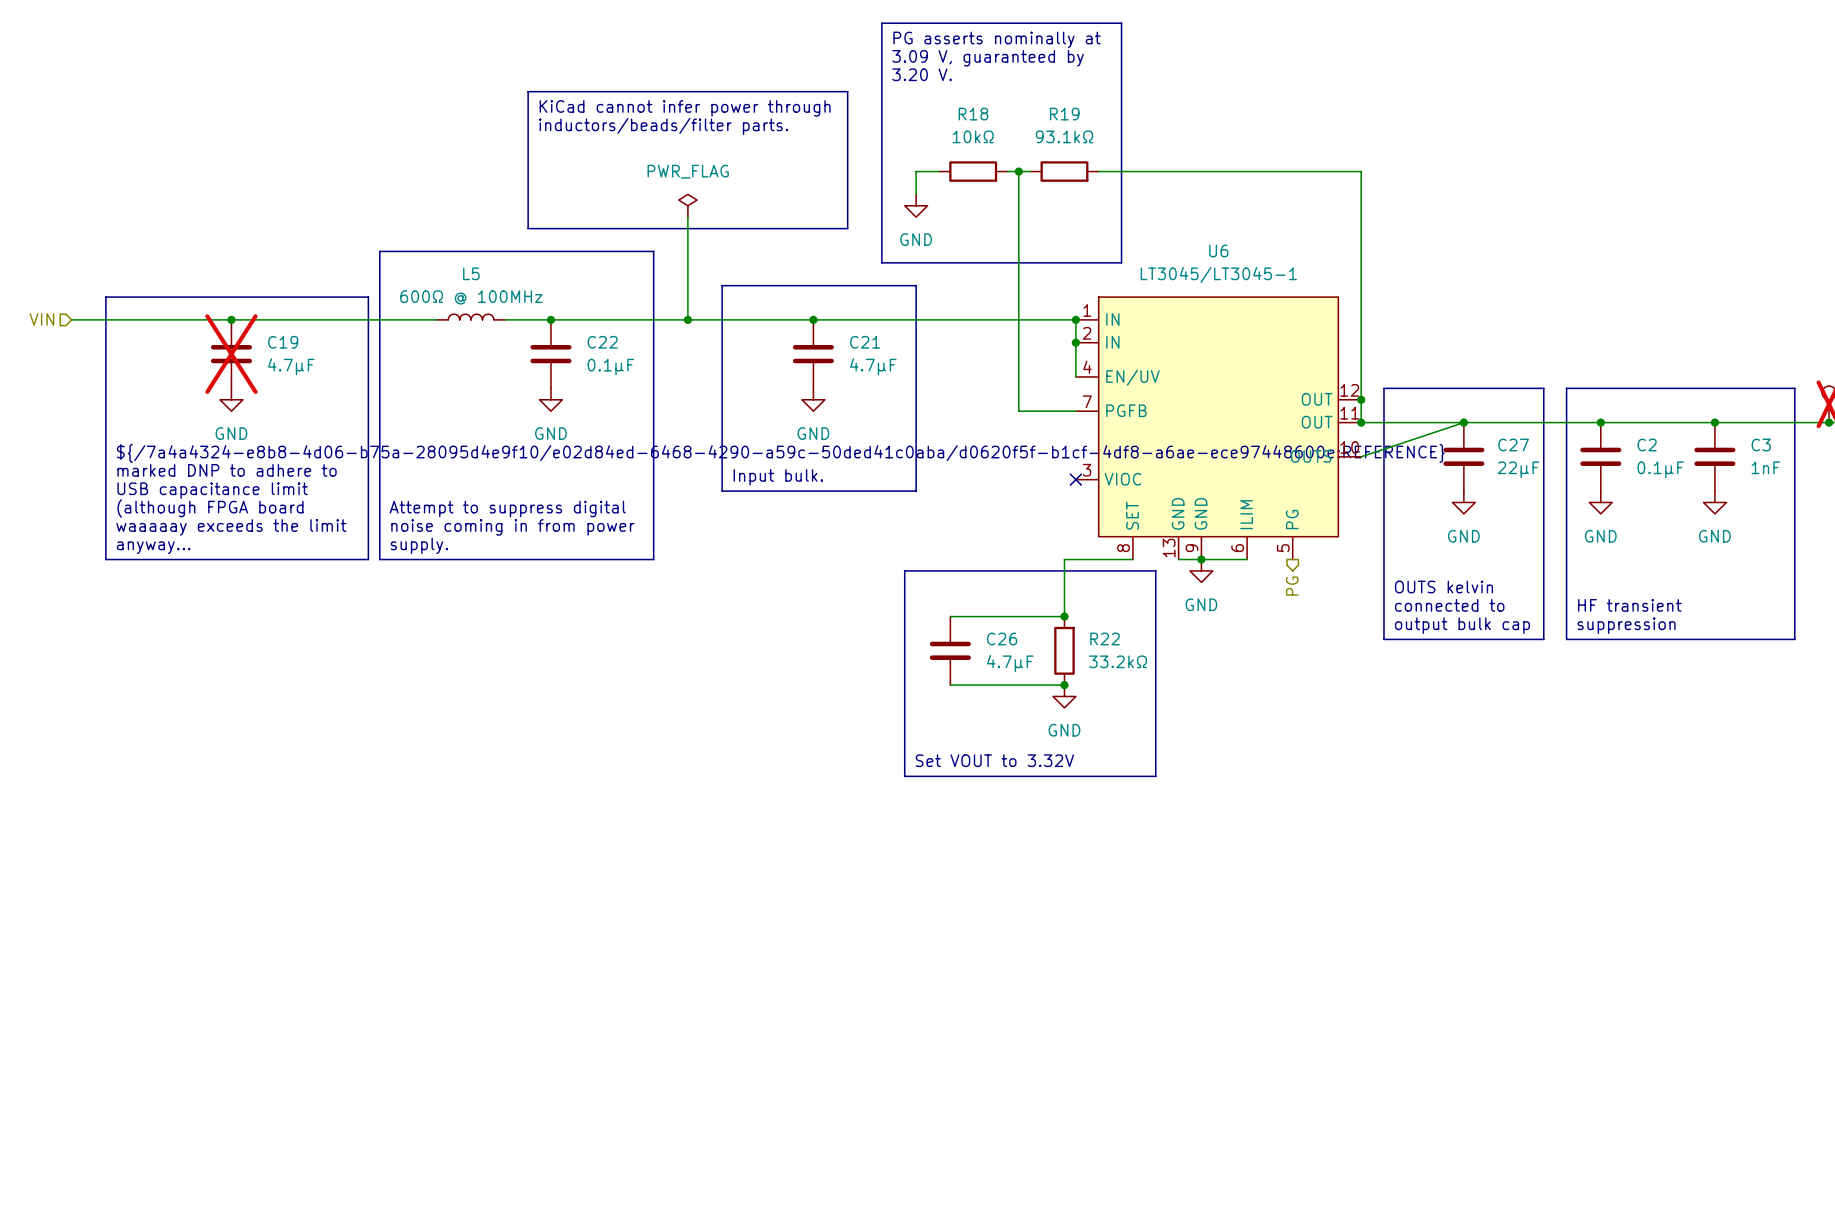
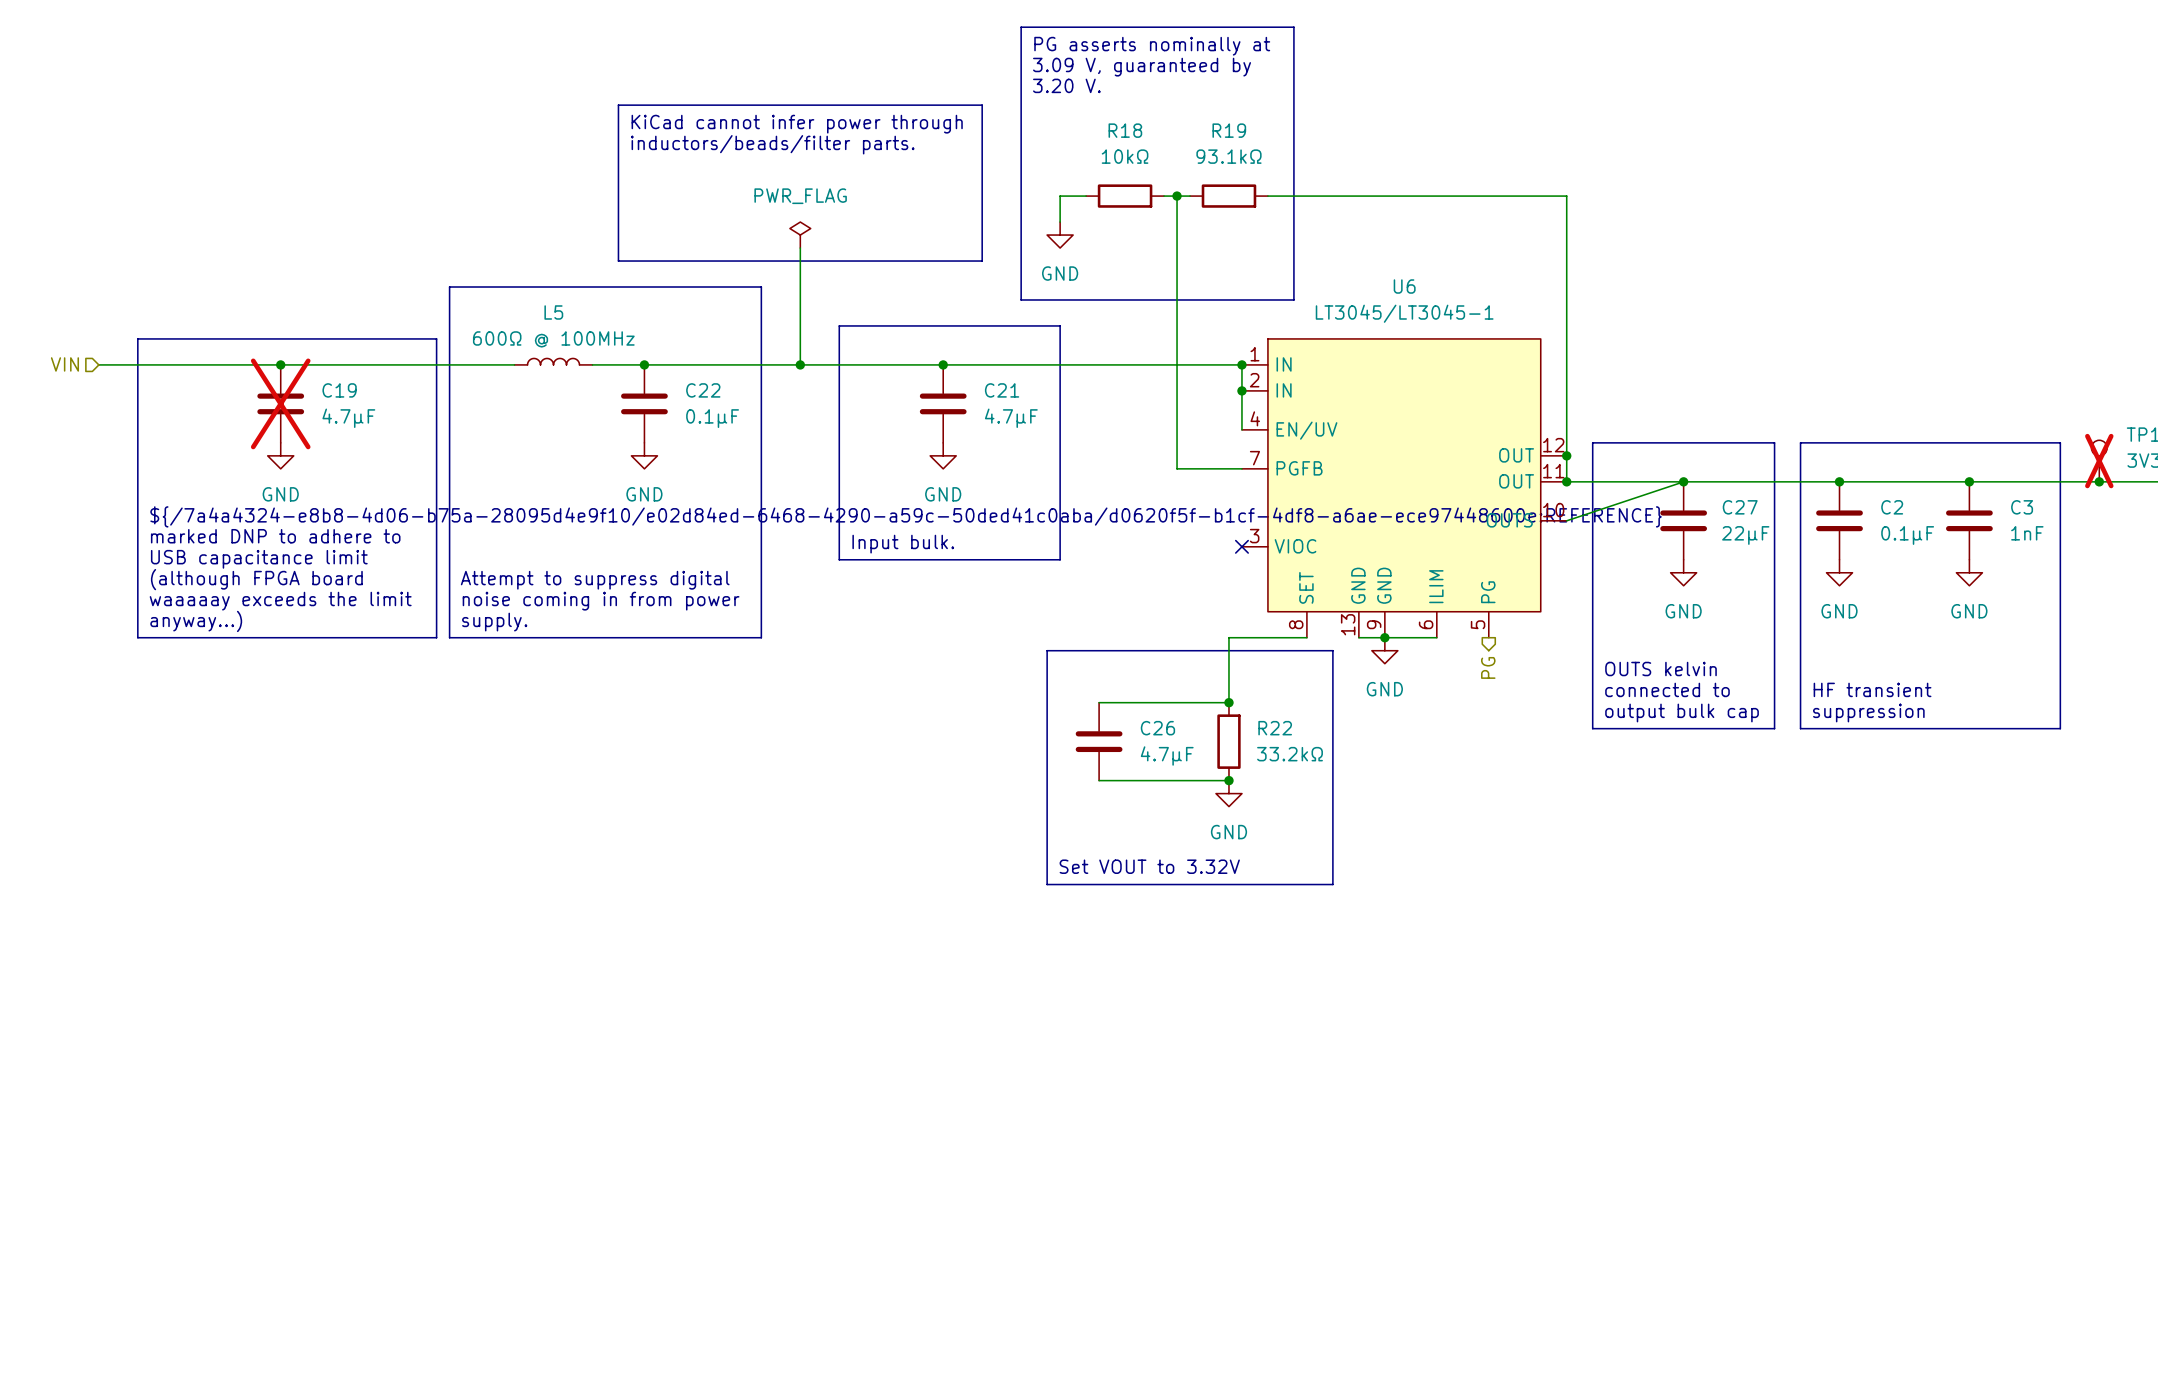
text: anyway... (153, 547) -> anyway...) (196, 621)

